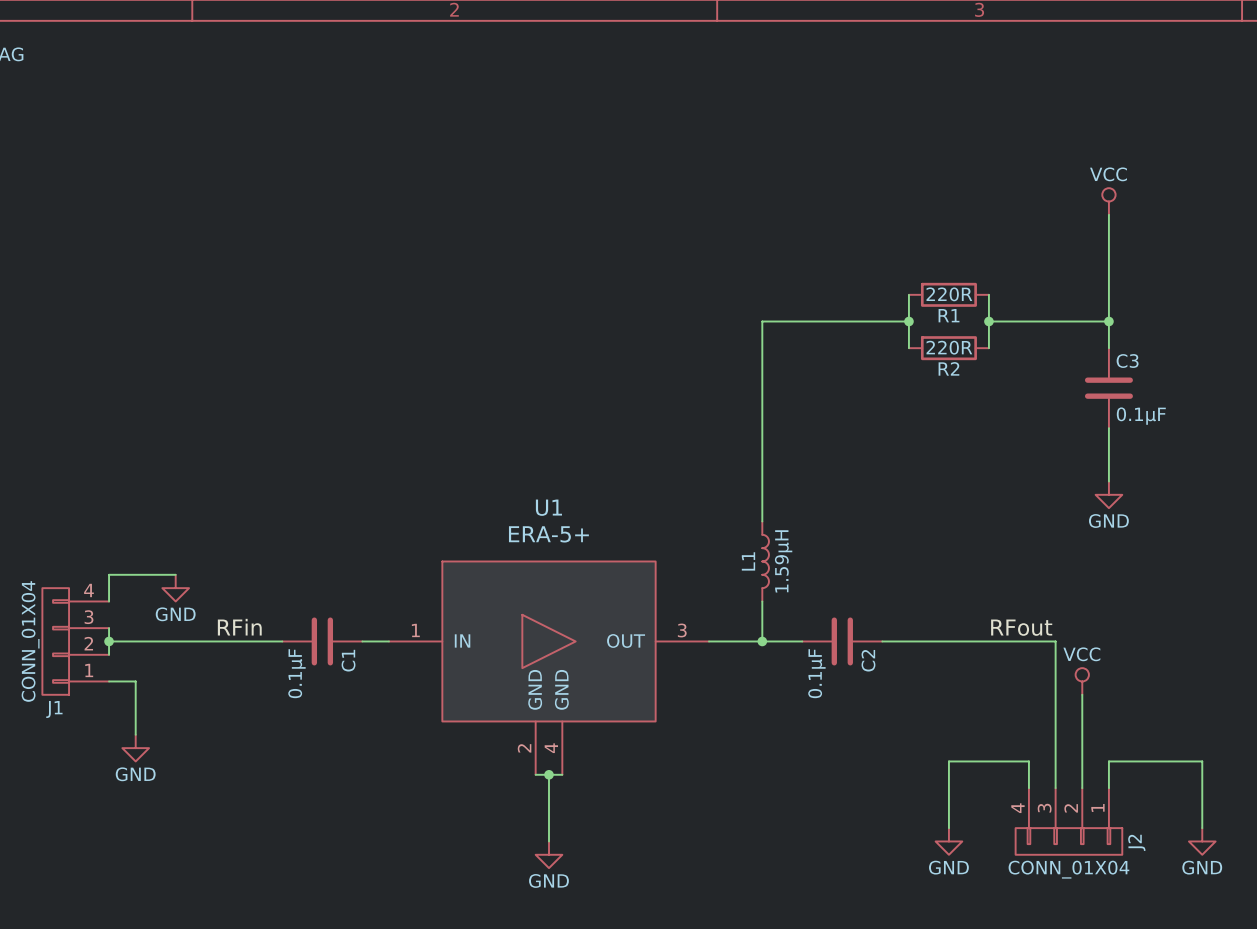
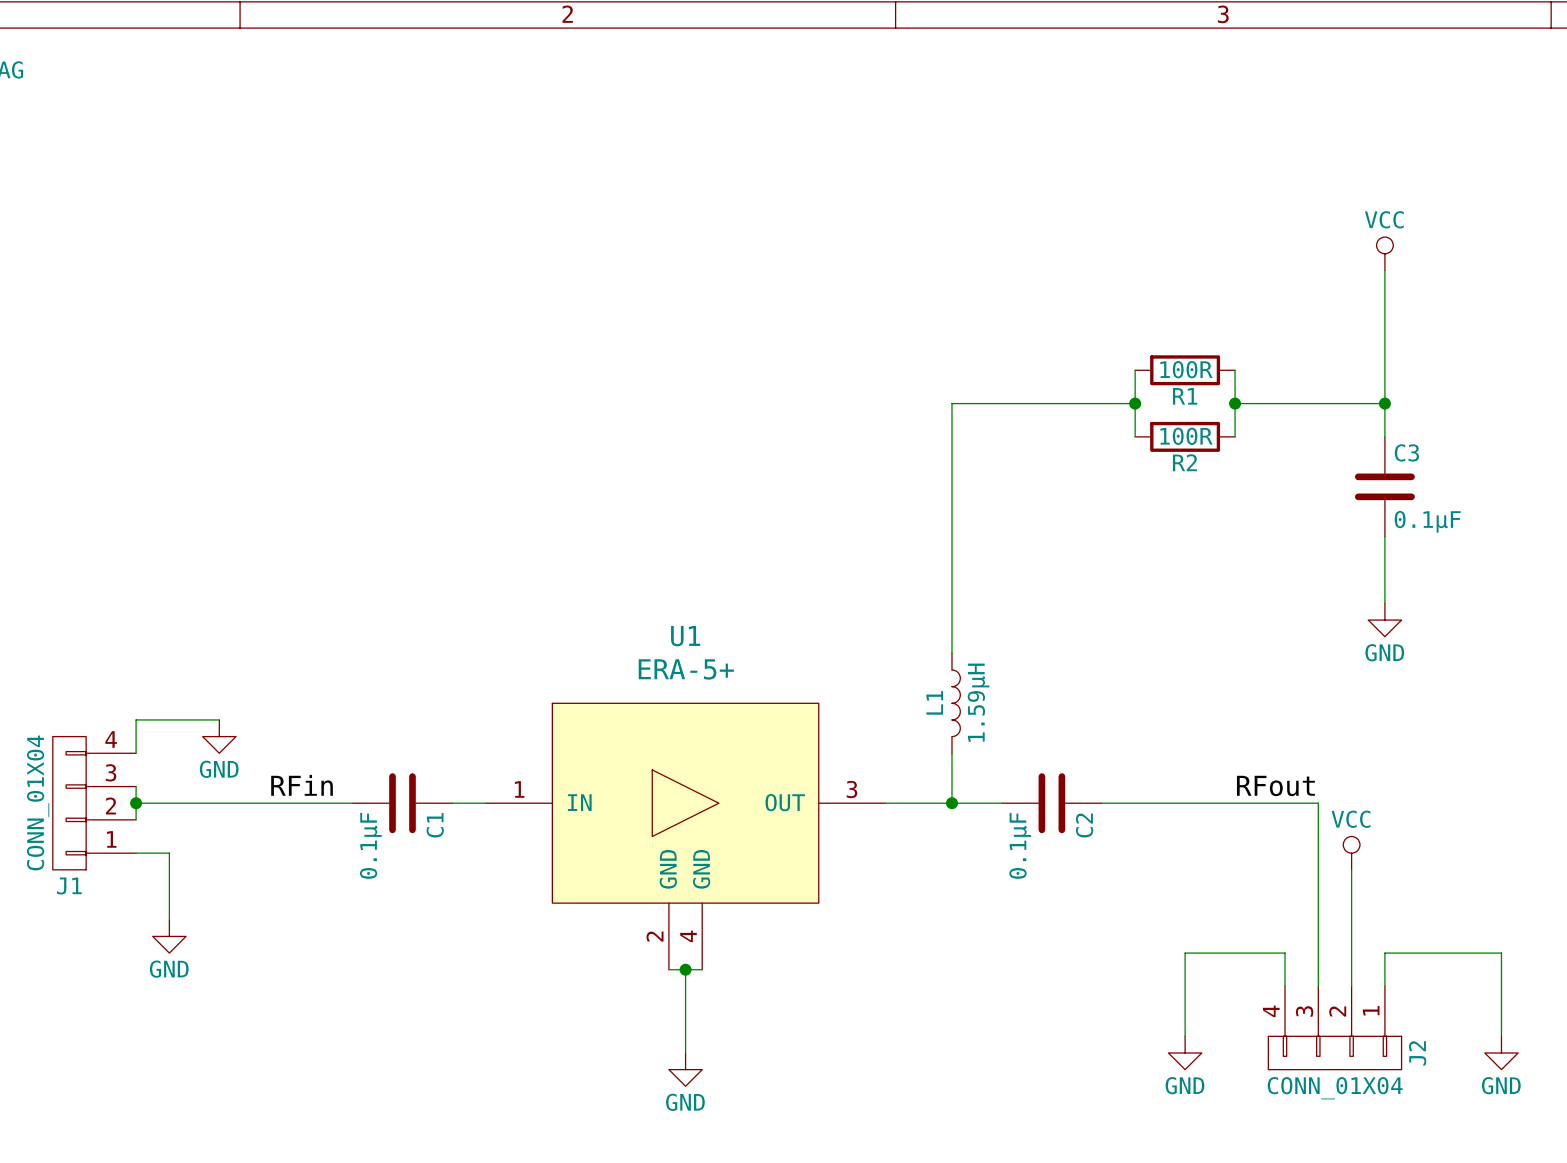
R1 value: 220R (949, 294) -> 100R (1186, 369)
R2 value: 220R (949, 347) -> 100R (1186, 436)

